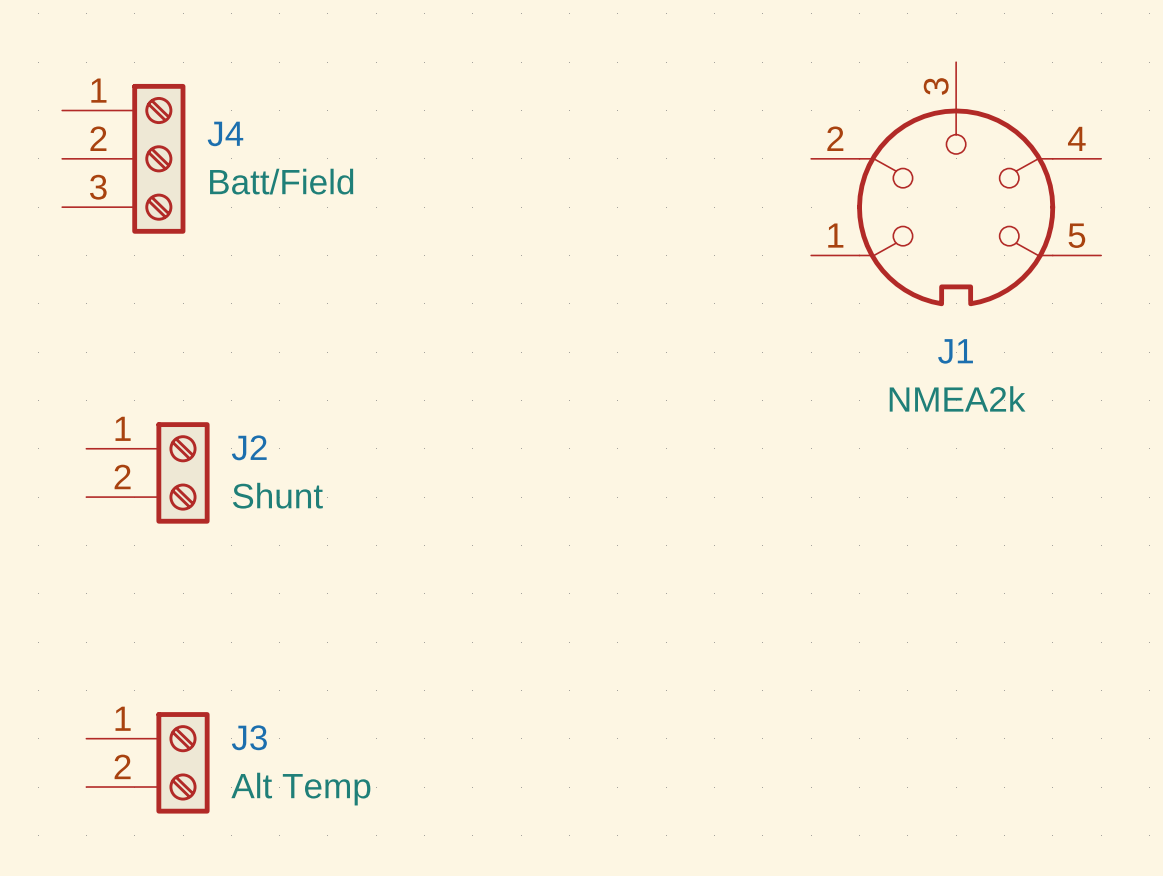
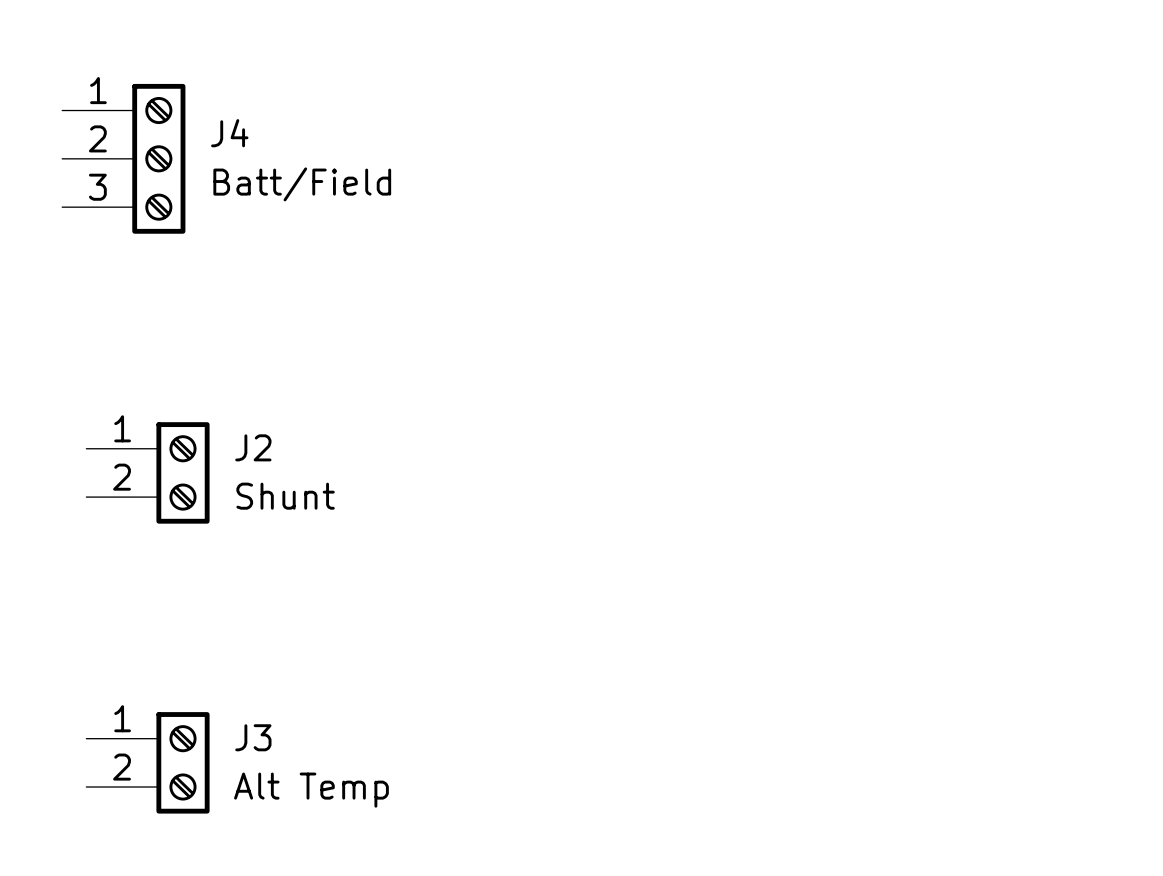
J1: NMEA2k (956, 184) -> none

